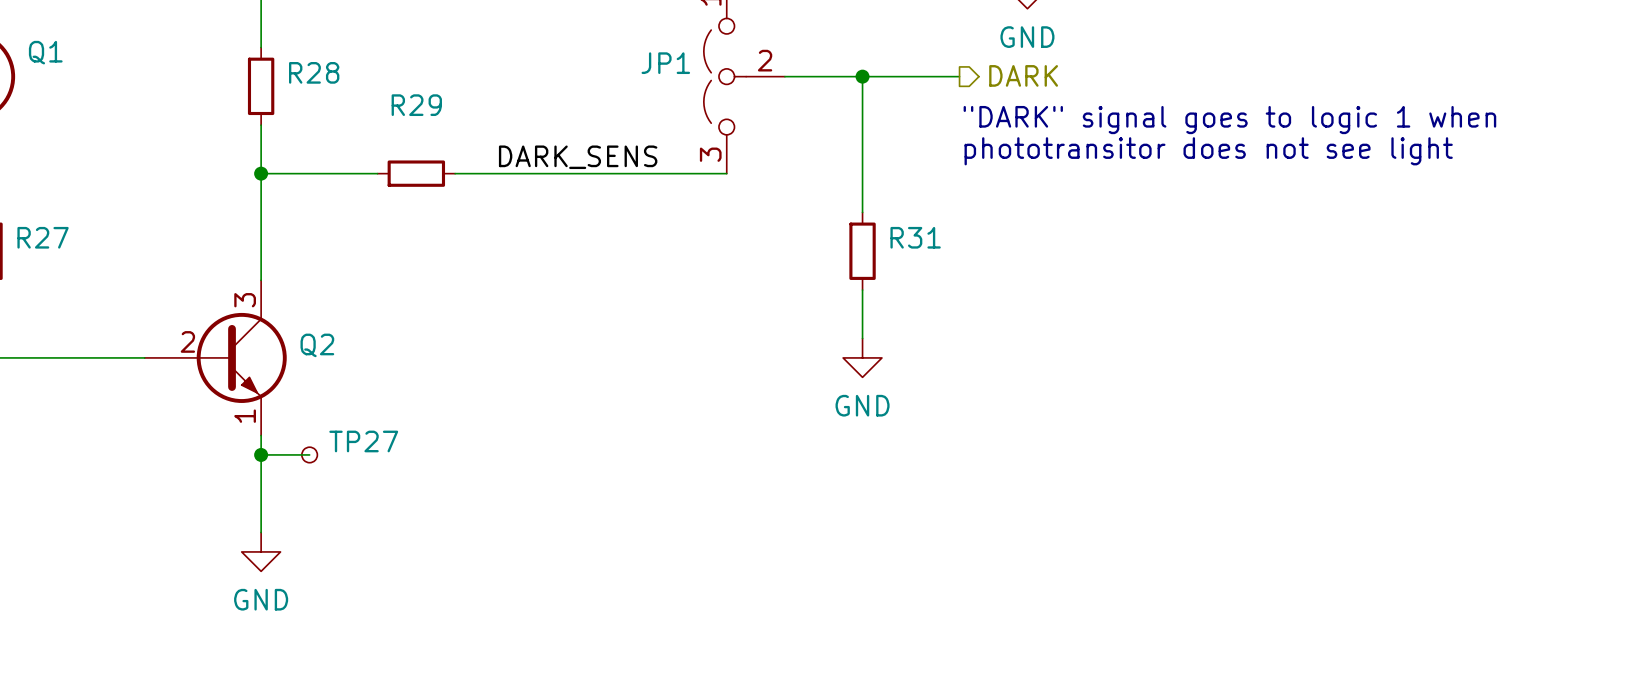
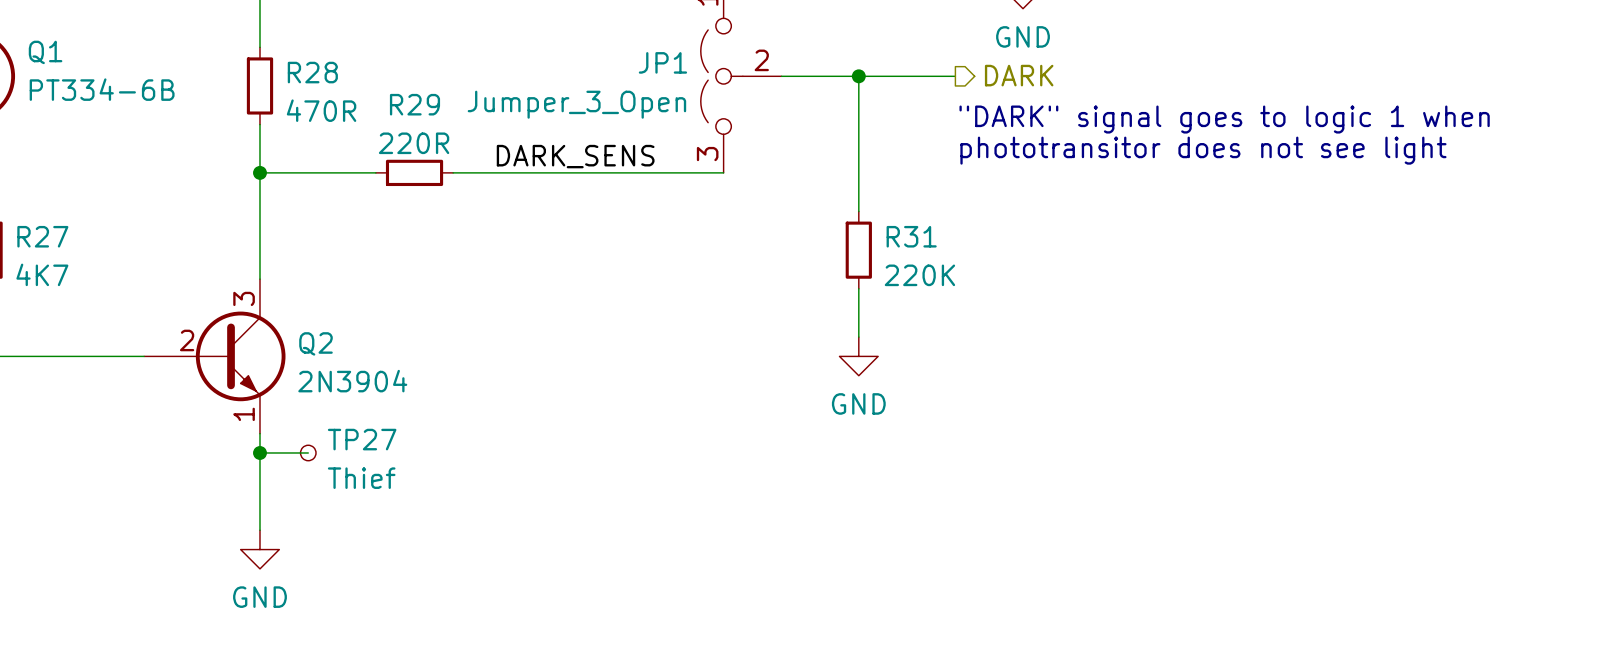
Q1 value: none -> PT334-6B (102, 89)
JP1 value: none -> Jumper_3_Open (576, 104)
R28 value: none -> 470R (321, 110)
R29 value: none -> 220R (414, 143)
R27 value: none -> 4K7 (42, 274)
R31 value: none -> 220K (919, 275)
Q2 value: none -> 2N3904 (352, 381)
TP27 value: none -> Thief (361, 478)

